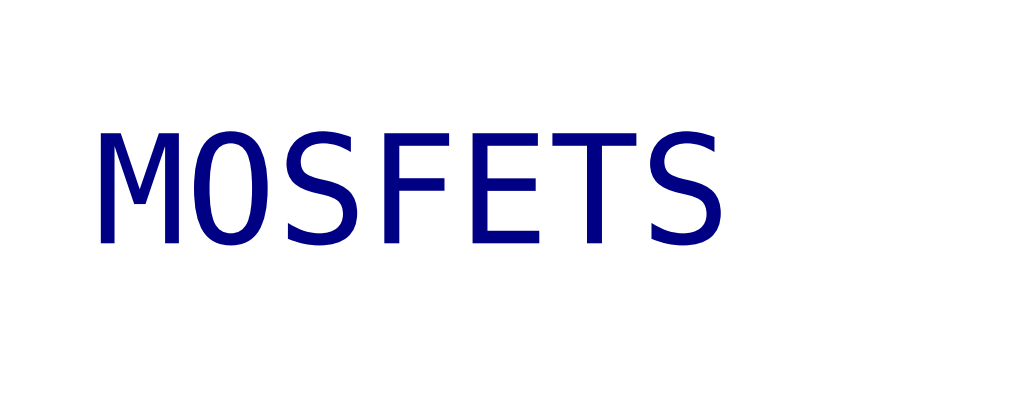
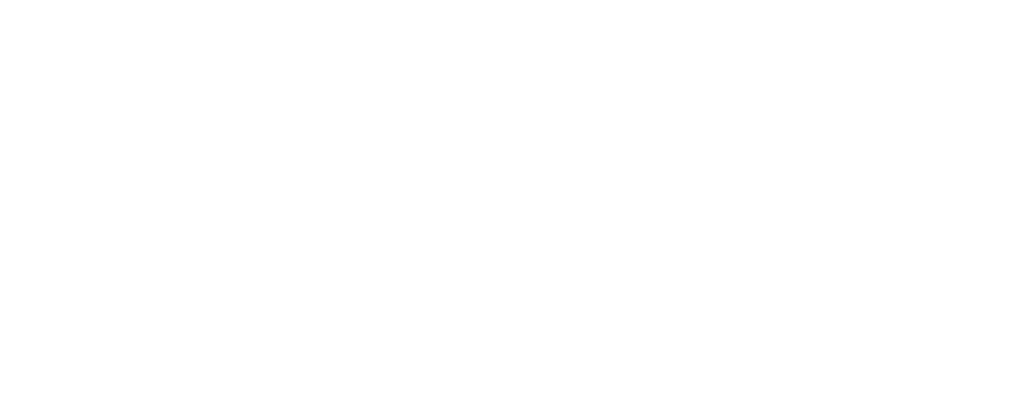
text: MOSFETS (410, 188) -> none

